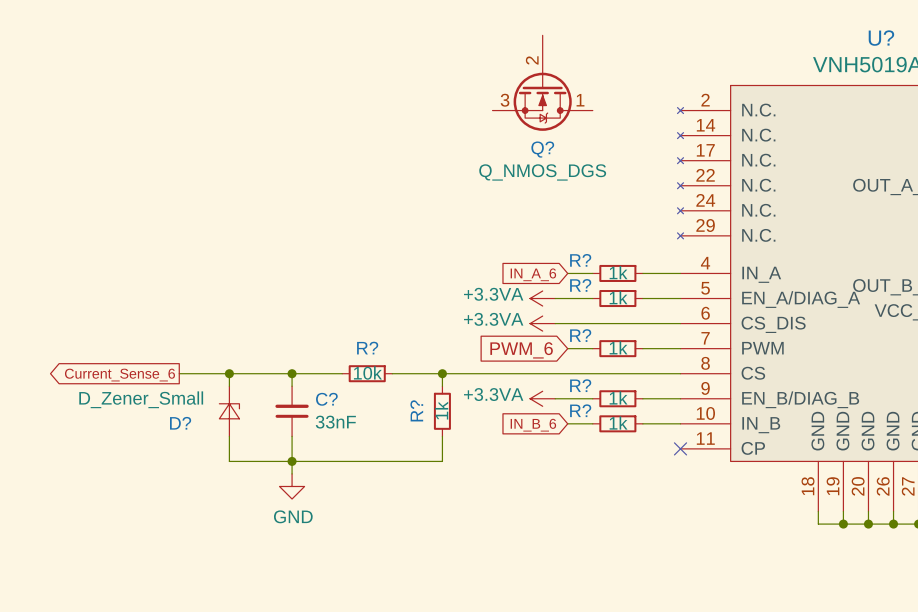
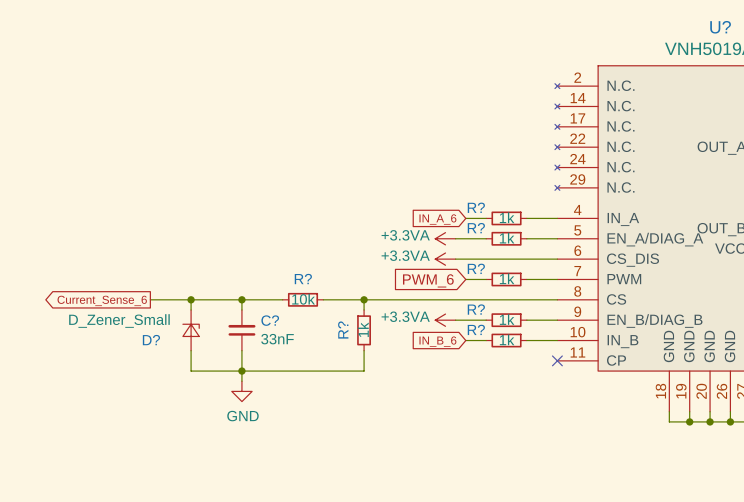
Q?: Q_NMOS_DGS (542, 83) -> none

